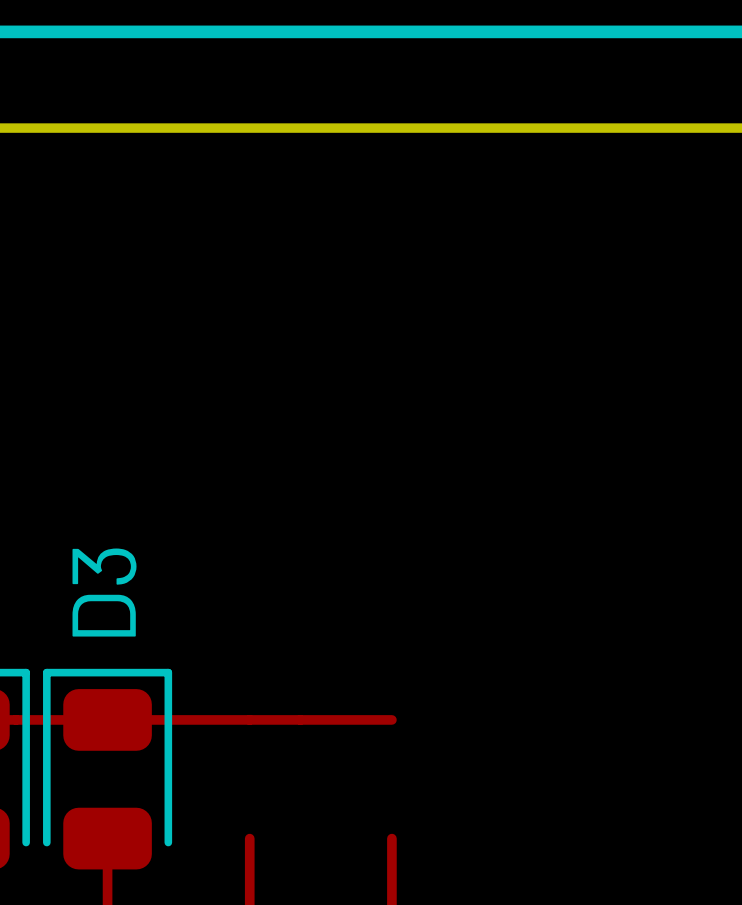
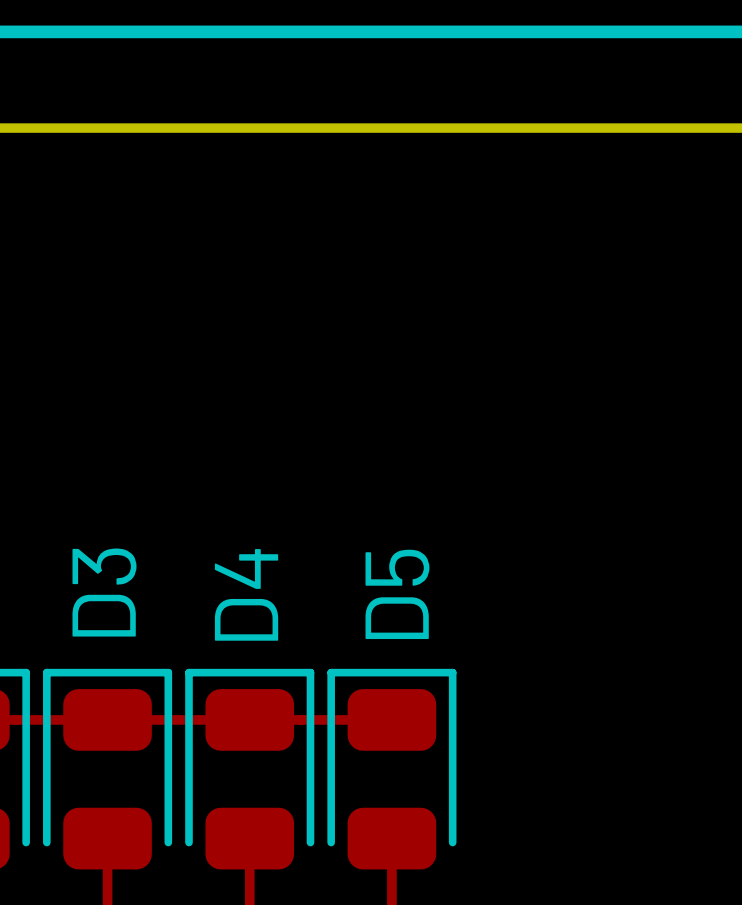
D4: none -> (249, 769)
D5: none -> (391, 769)

